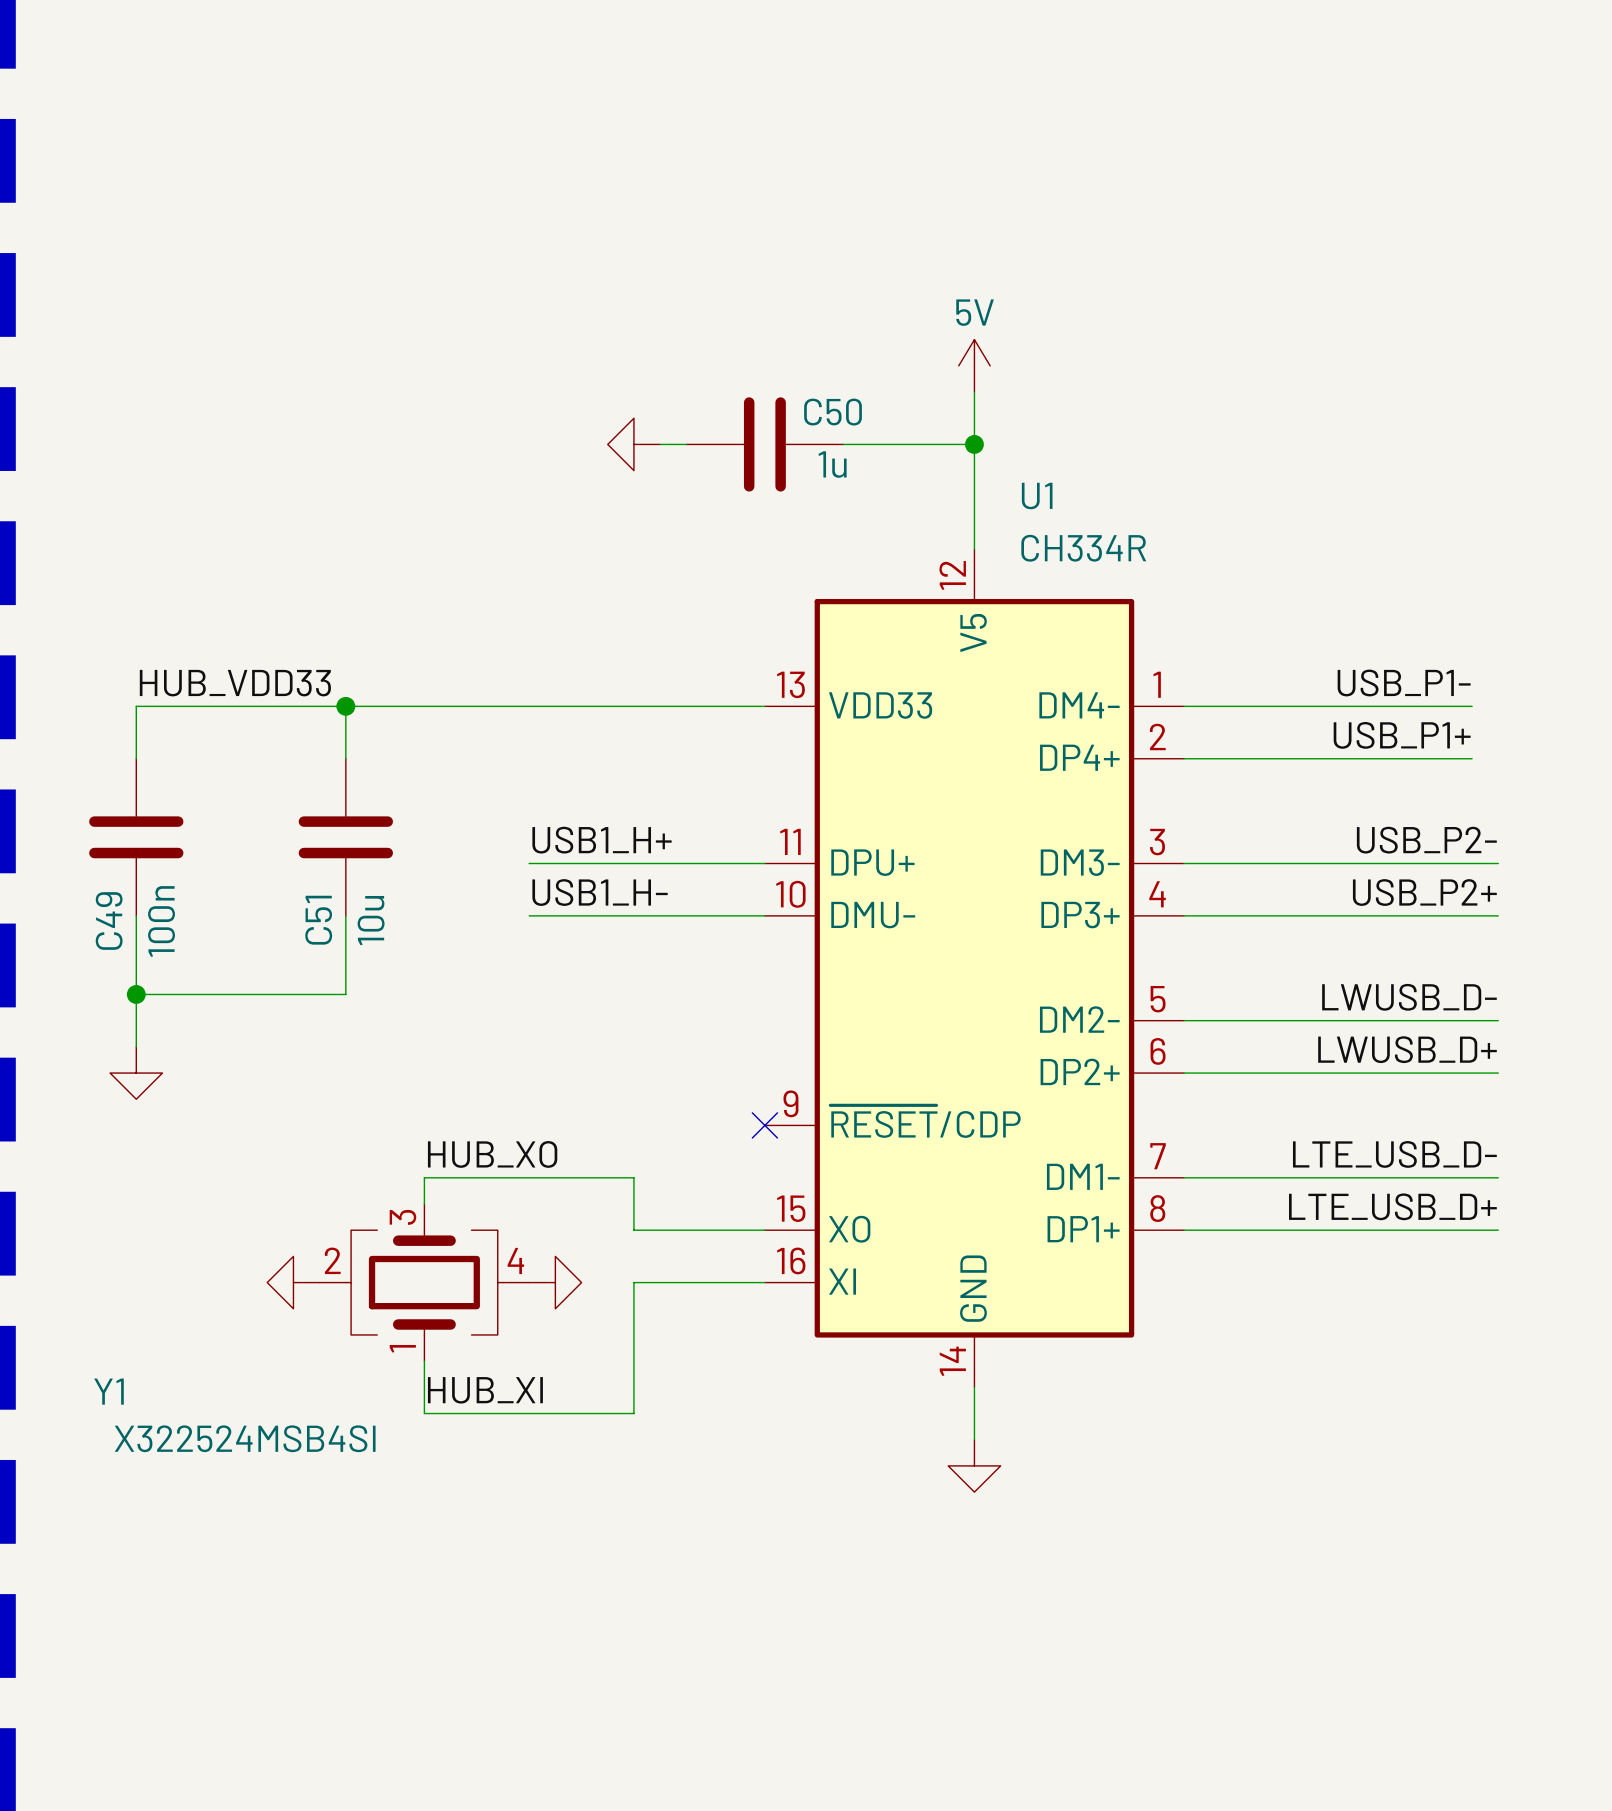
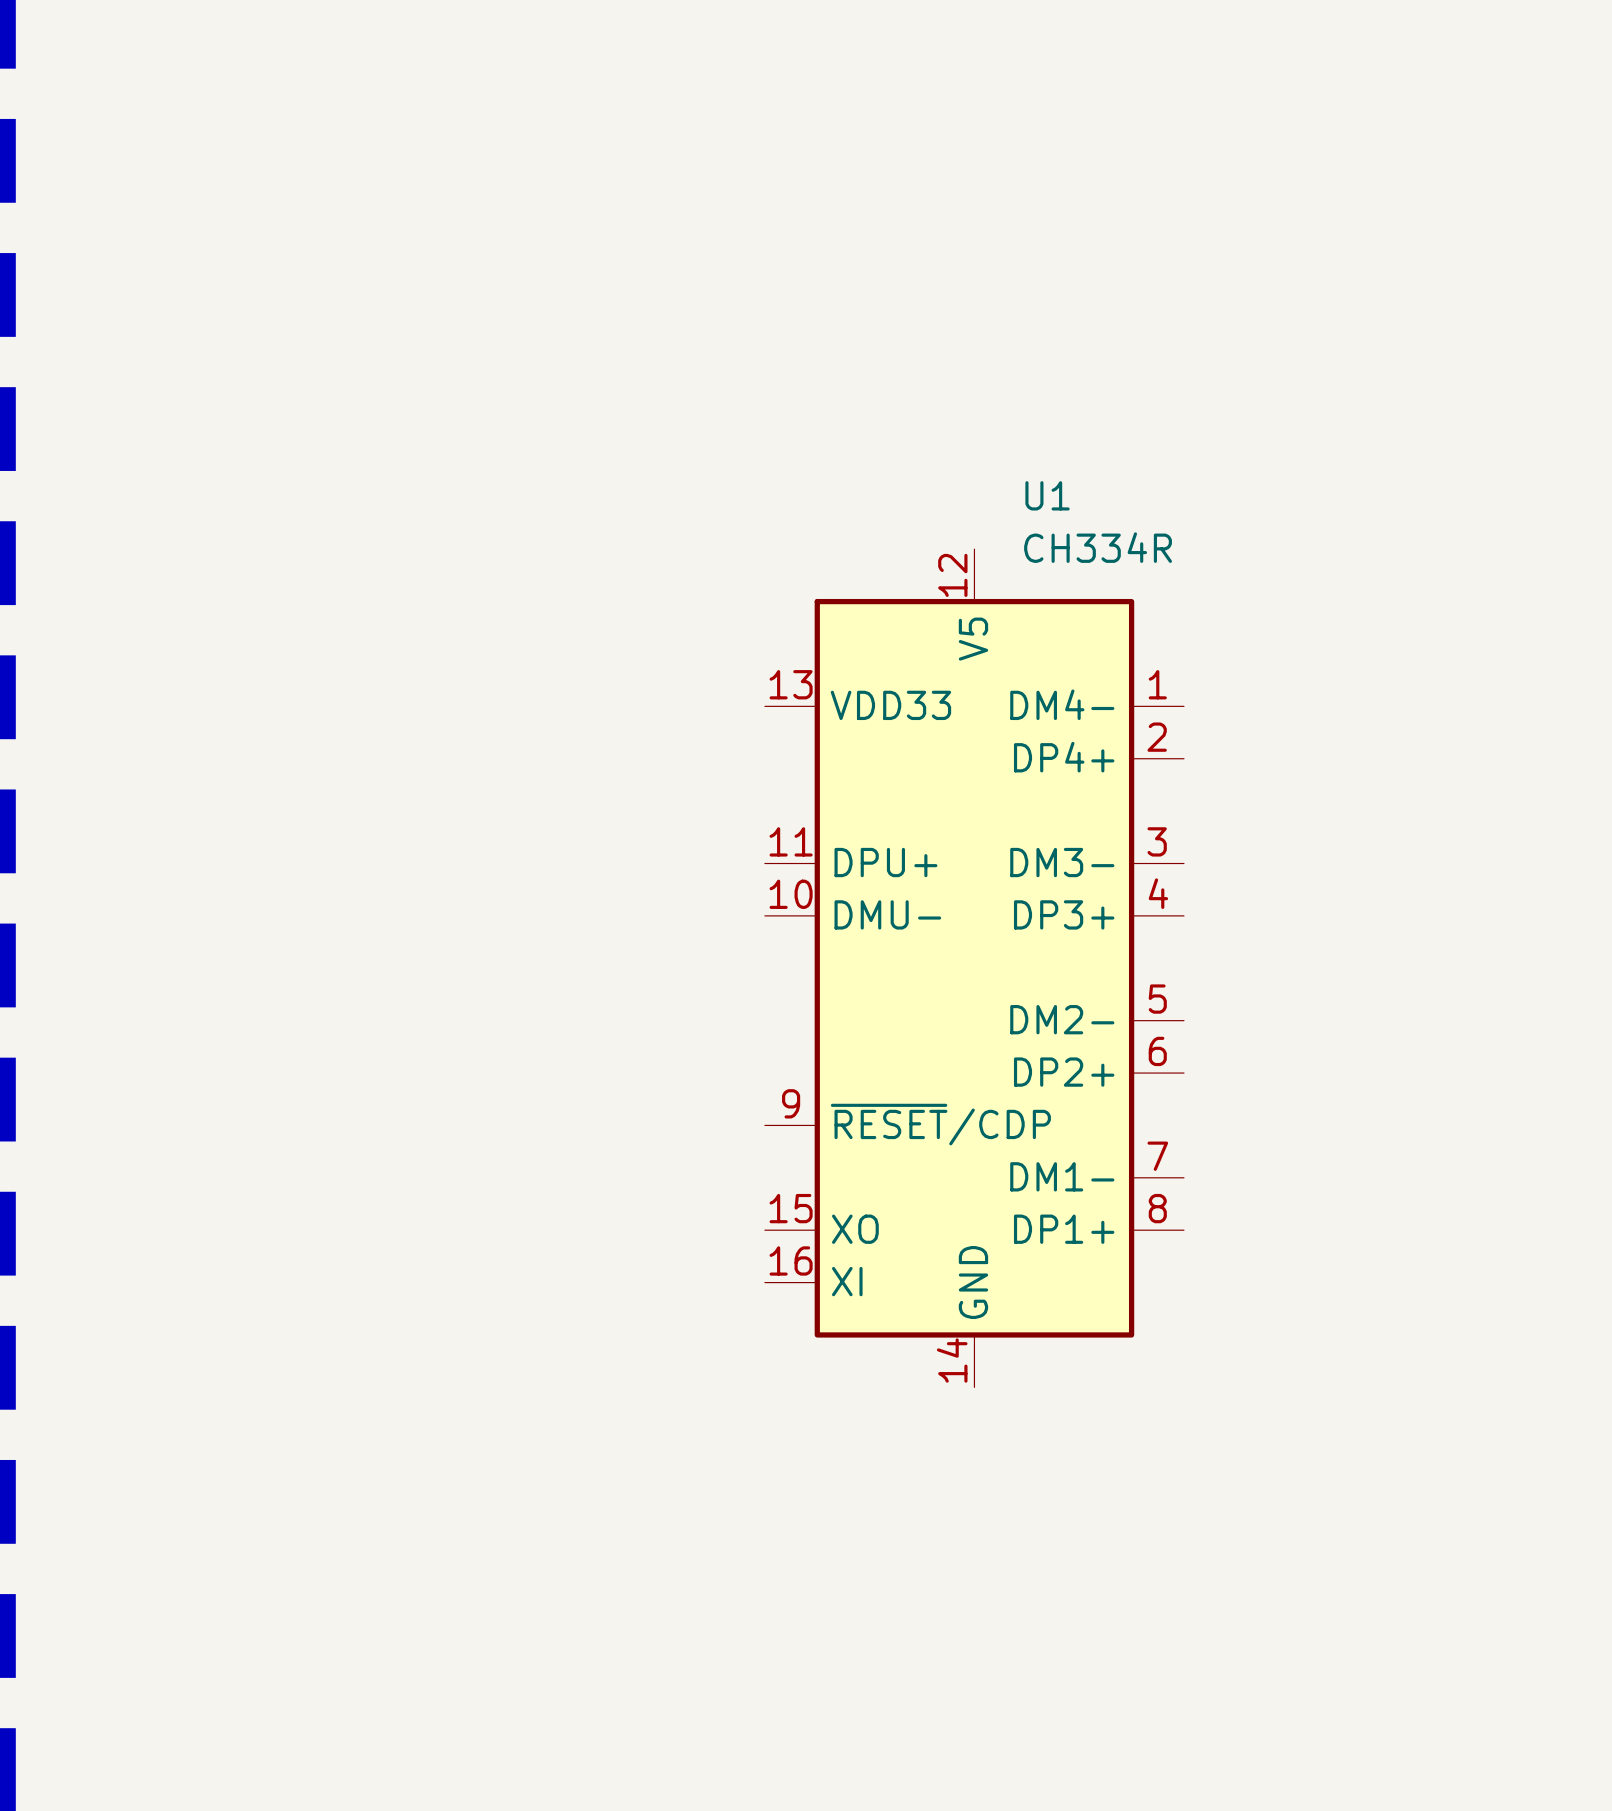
power symbol: 5V (974, 365) -> none
wire: (974, 392) (974, 549) -> none
power symbol: (633, 444) -> none
wire: (660, 444) (686, 444) -> none
C50: 1u (764, 444) -> none
wire: (843, 444) (974, 444) -> none
junction: (974, 444) -> none
label: USB_P1- (1404, 682) -> none
label: HUB_VDD33 (235, 683) -> none
wire: (345, 706) (345, 758) -> none
junction: (345, 706) -> none
wire: (764, 706) (136, 706) (136, 758) -> none
wire: (1183, 706) (1472, 706) -> none
label: USB_P1+ (1402, 735) -> none
wire: (1183, 758) (1472, 758) -> none
C49: 100n (136, 837) -> none
C51: 10u (345, 837) -> none
label: USB1_H+ (602, 840) -> none
label: USB_P2- (1426, 840) -> none
wire: (529, 863) (764, 863) -> none
wire: (1183, 863) (1498, 863) -> none
label: USB1_H- (600, 892) -> none
label: USB_P2+ (1424, 892) -> none
wire: (136, 915) (136, 1046) -> none
wire: (345, 915) (345, 994) (136, 994) -> none
wire: (529, 915) (764, 915) -> none
wire: (1183, 915) (1498, 915) -> none
junction: (136, 994) -> none
label: LWUSB_D- (1409, 997) -> none
wire: (1183, 1020) (1498, 1020) -> none
label: LWUSB_D+ (1407, 1049) -> none
power symbol: (136, 1073) -> none
wire: (1183, 1073) (1498, 1073) -> none
no-connect mark: (764, 1125) -> none
label: HUB_XO (492, 1154) -> none
label: LTE_USB_D- (1394, 1154) -> none
wire: (1183, 1177) (1498, 1177) -> none
wire: (424, 1204) (424, 1177) (633, 1177) (633, 1230) (764, 1230) -> none
label: LTE_USB_D+ (1392, 1206) -> none
wire: (1183, 1230) (1498, 1230) -> none
power symbol: (293, 1282) -> none
Y1: X322524MSB4SI (424, 1282) -> none
power symbol: (555, 1282) -> none
wire: (764, 1282) (633, 1282) (633, 1413) (424, 1413) (424, 1361) -> none
wire: (974, 1387) (974, 1439) -> none
label: HUB_XI (485, 1390) -> none
power symbol: (974, 1465) -> none

